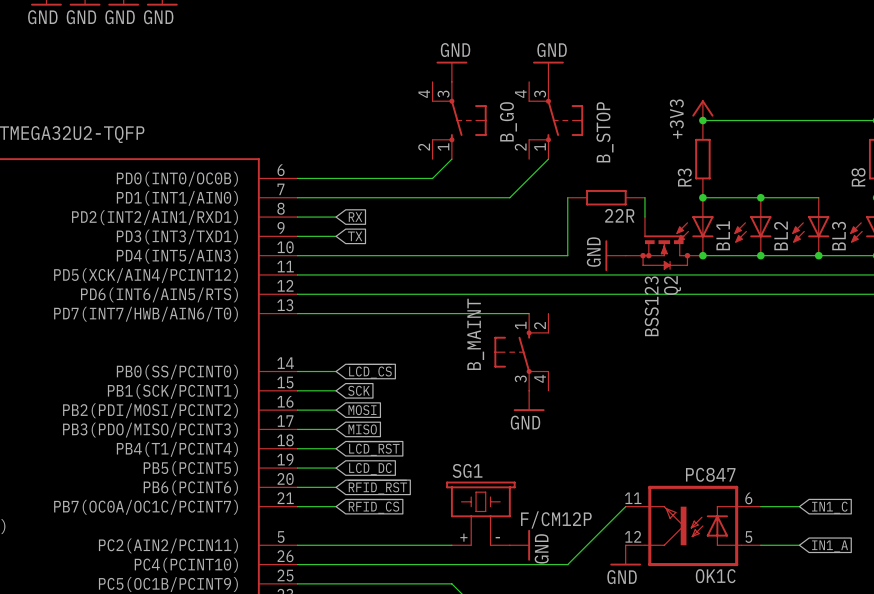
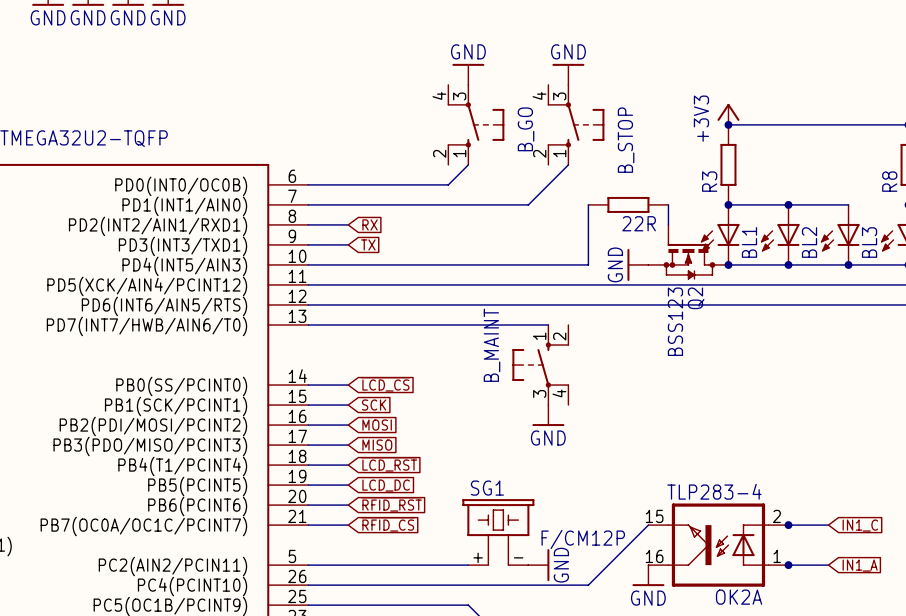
OK1C value: PC847 (710, 474) -> TLP283-4 (714, 491)
OK1C pin number: 11 (633, 498) -> 15 (654, 516)
OK1C pin number: 6 (748, 498) -> 2 (776, 516)
junction: none -> (788, 525)
OK1C pin number: 12 (633, 536) -> 16 (654, 556)
OK1C pin number: 5 (748, 537) -> 1 (777, 556)
junction: none -> (788, 565)
OK1C name: OK1C (715, 576) -> OK2A (739, 597)

